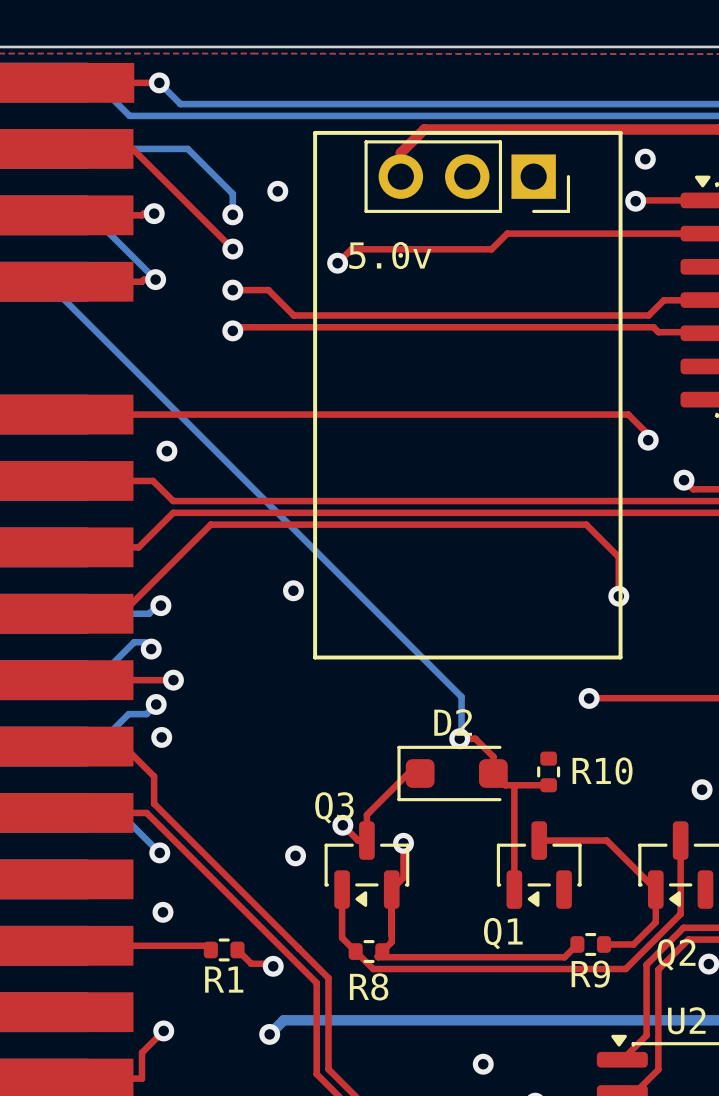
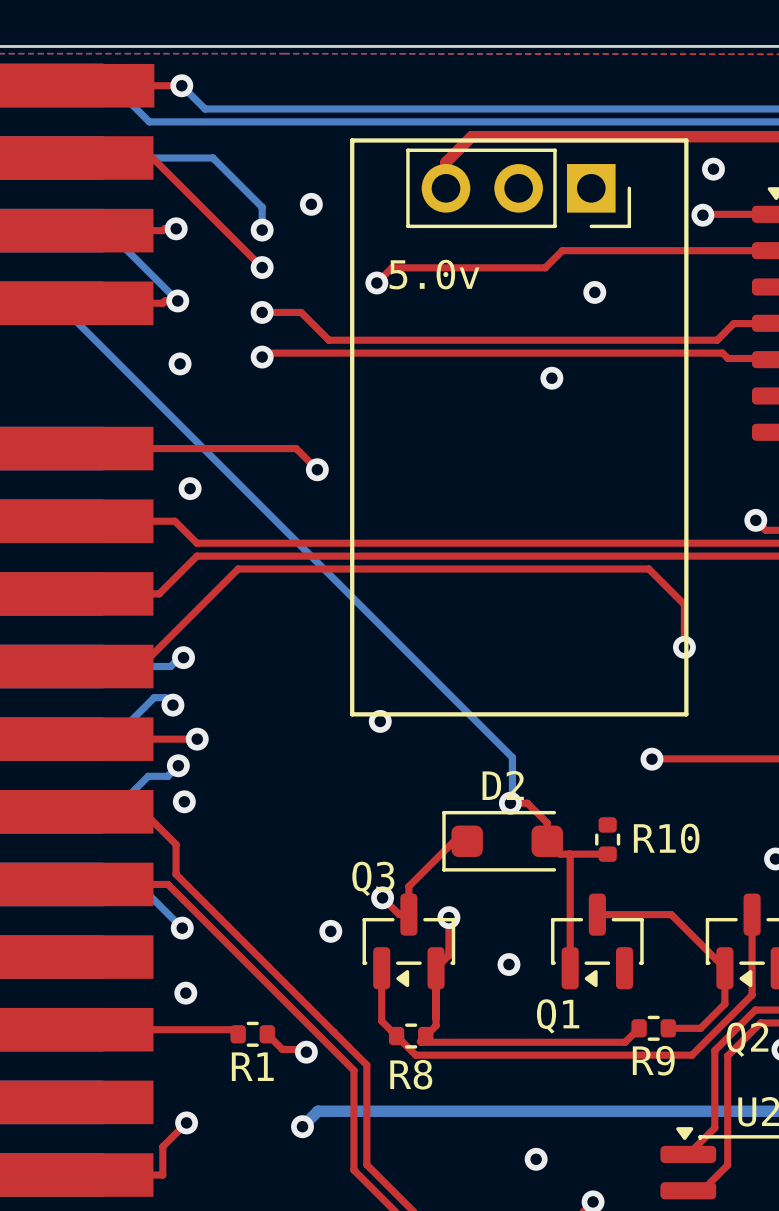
via: none -> (594, 292)
via: none -> (180, 363)
via: none -> (551, 378)
top track: (263, 414) (628, 414) (648, 434) (648, 440) -> (296, 448) (317, 469)
via: none -> (317, 469)
via: (648, 440) -> none
via: (293, 590) -> none
via: none -> (380, 721)
via: none -> (508, 964)

